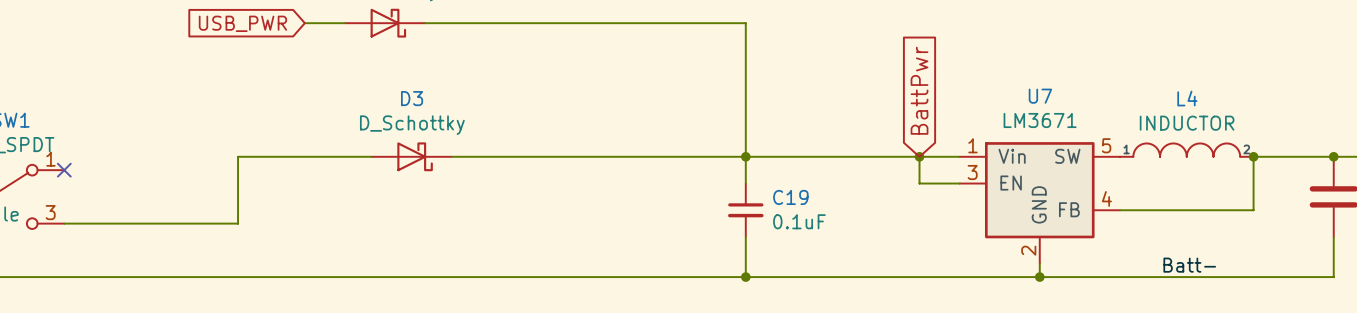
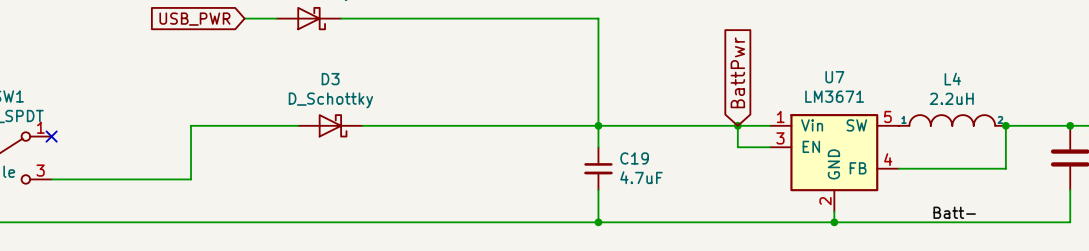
L4 value: INDUCTOR (1187, 123) -> 2.2uH (951, 98)
C19 value: 0.1uF (799, 221) -> 4.7uF (641, 177)

